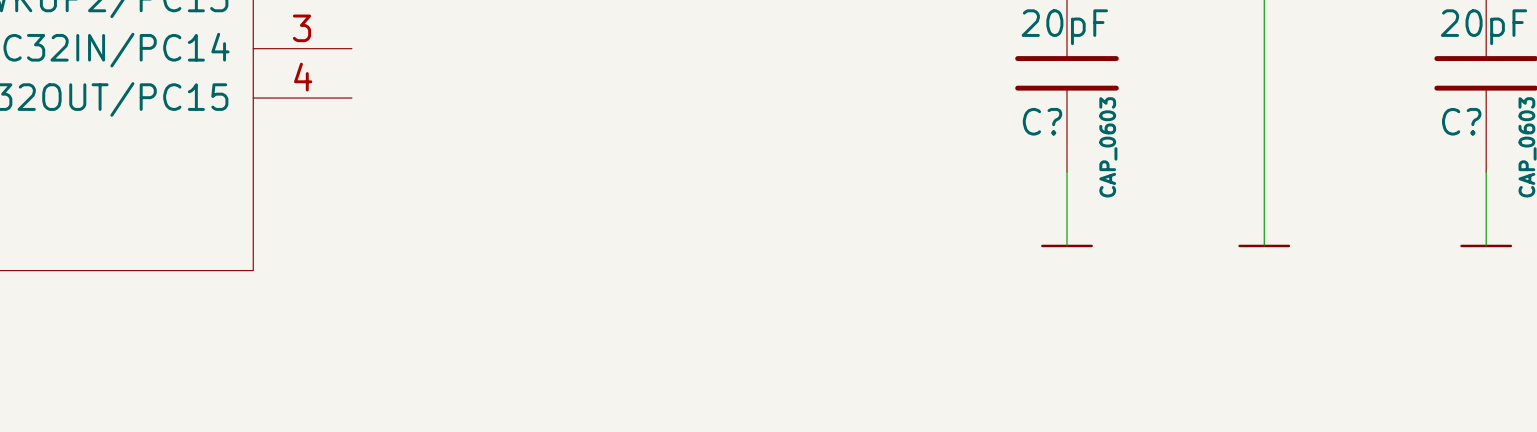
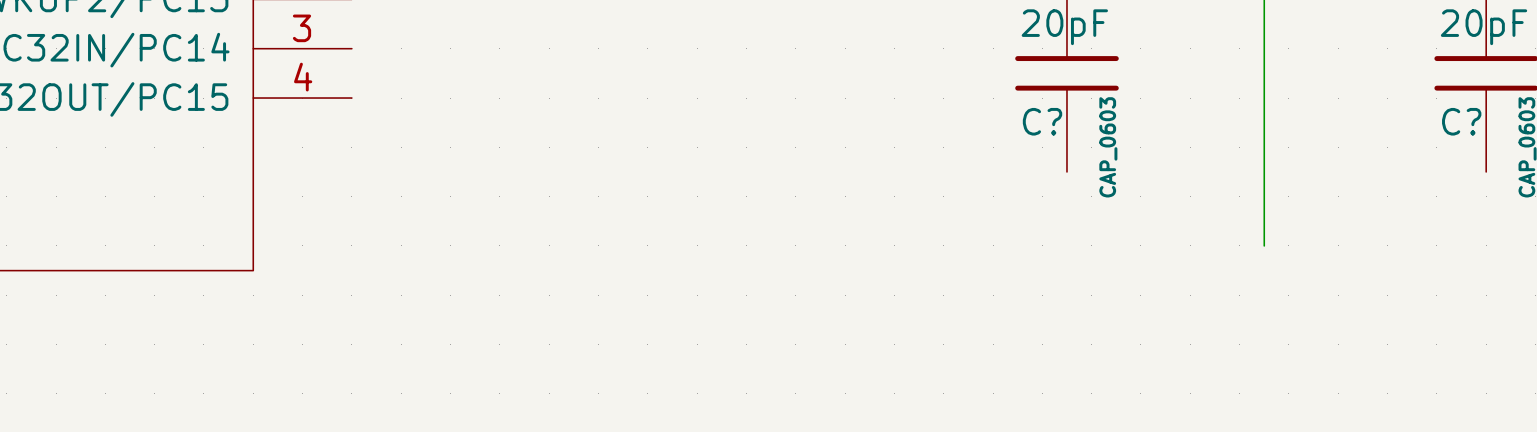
wire: (1066, 171) (1066, 245) -> none
wire: (1486, 171) (1486, 245) -> none
power symbol: (1066, 245) -> none
power symbol: (1264, 245) -> none
power symbol: (1486, 245) -> none

